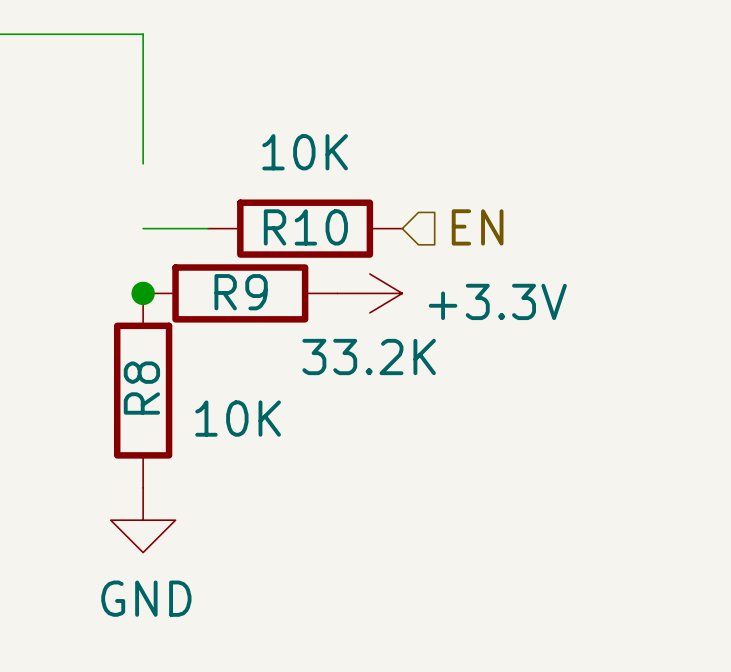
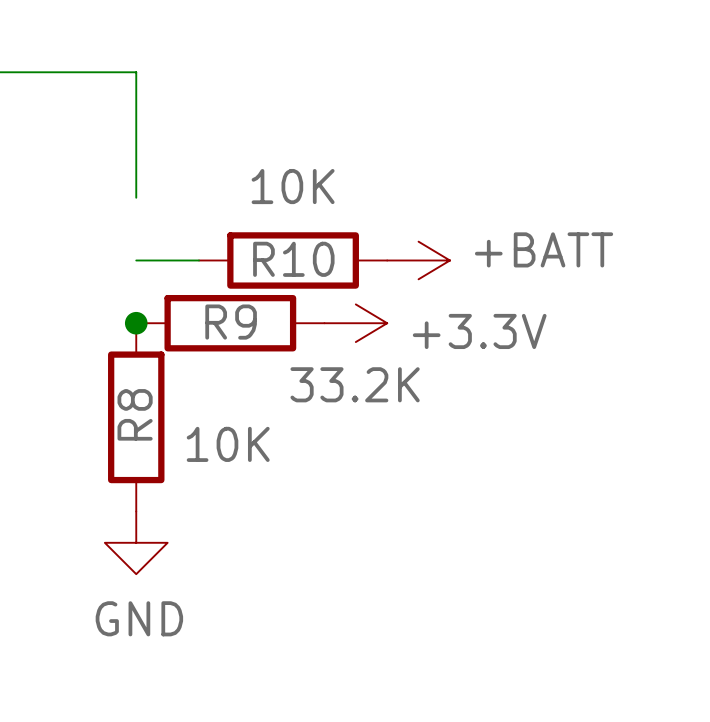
hierarchical label: EN (477, 227) -> none
power symbol: none -> +BATT (418, 260)

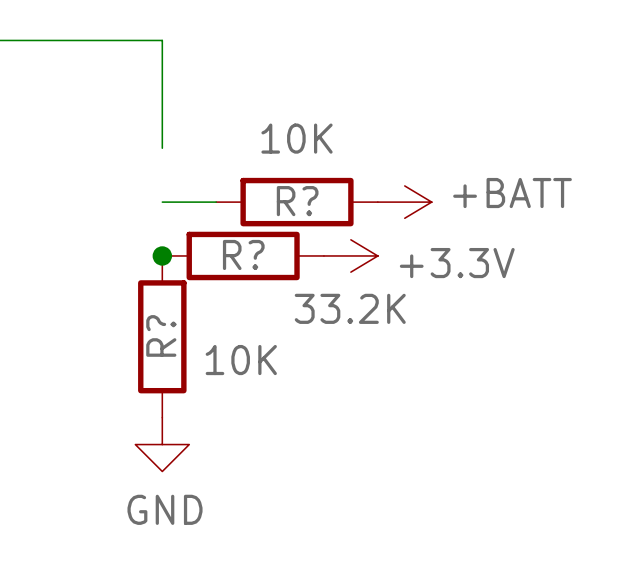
R10 name: R10 (293, 259) -> R? (297, 201)
R9 name: R9 (231, 322) -> R? (243, 254)
R8 name: R8 (135, 414) -> R? (161, 335)

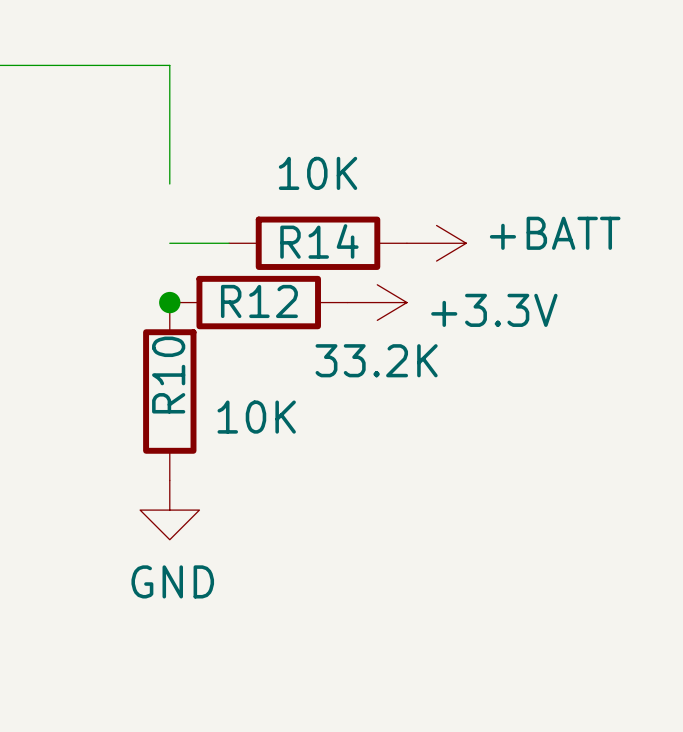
R? name: R? (297, 201) -> R14 (319, 241)
R? name: R? (243, 254) -> R12 (259, 301)
R? name: R? (161, 335) -> R10 (168, 375)

